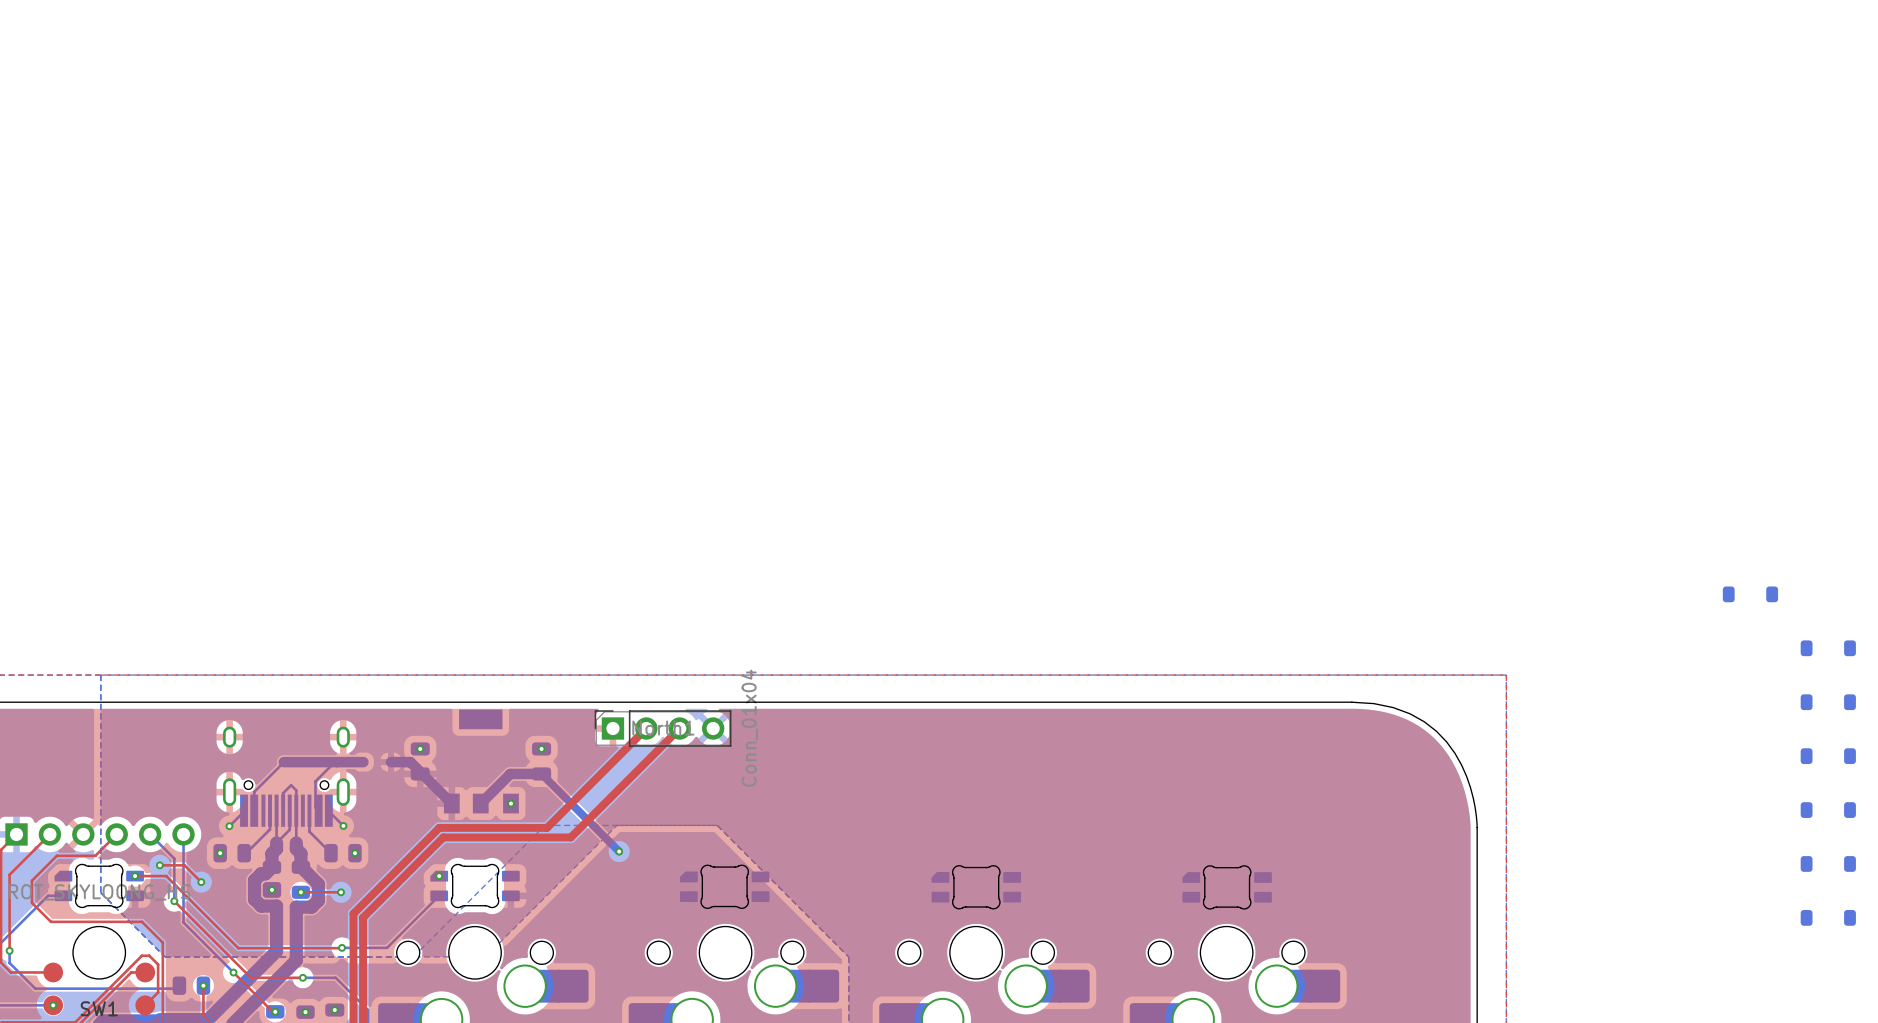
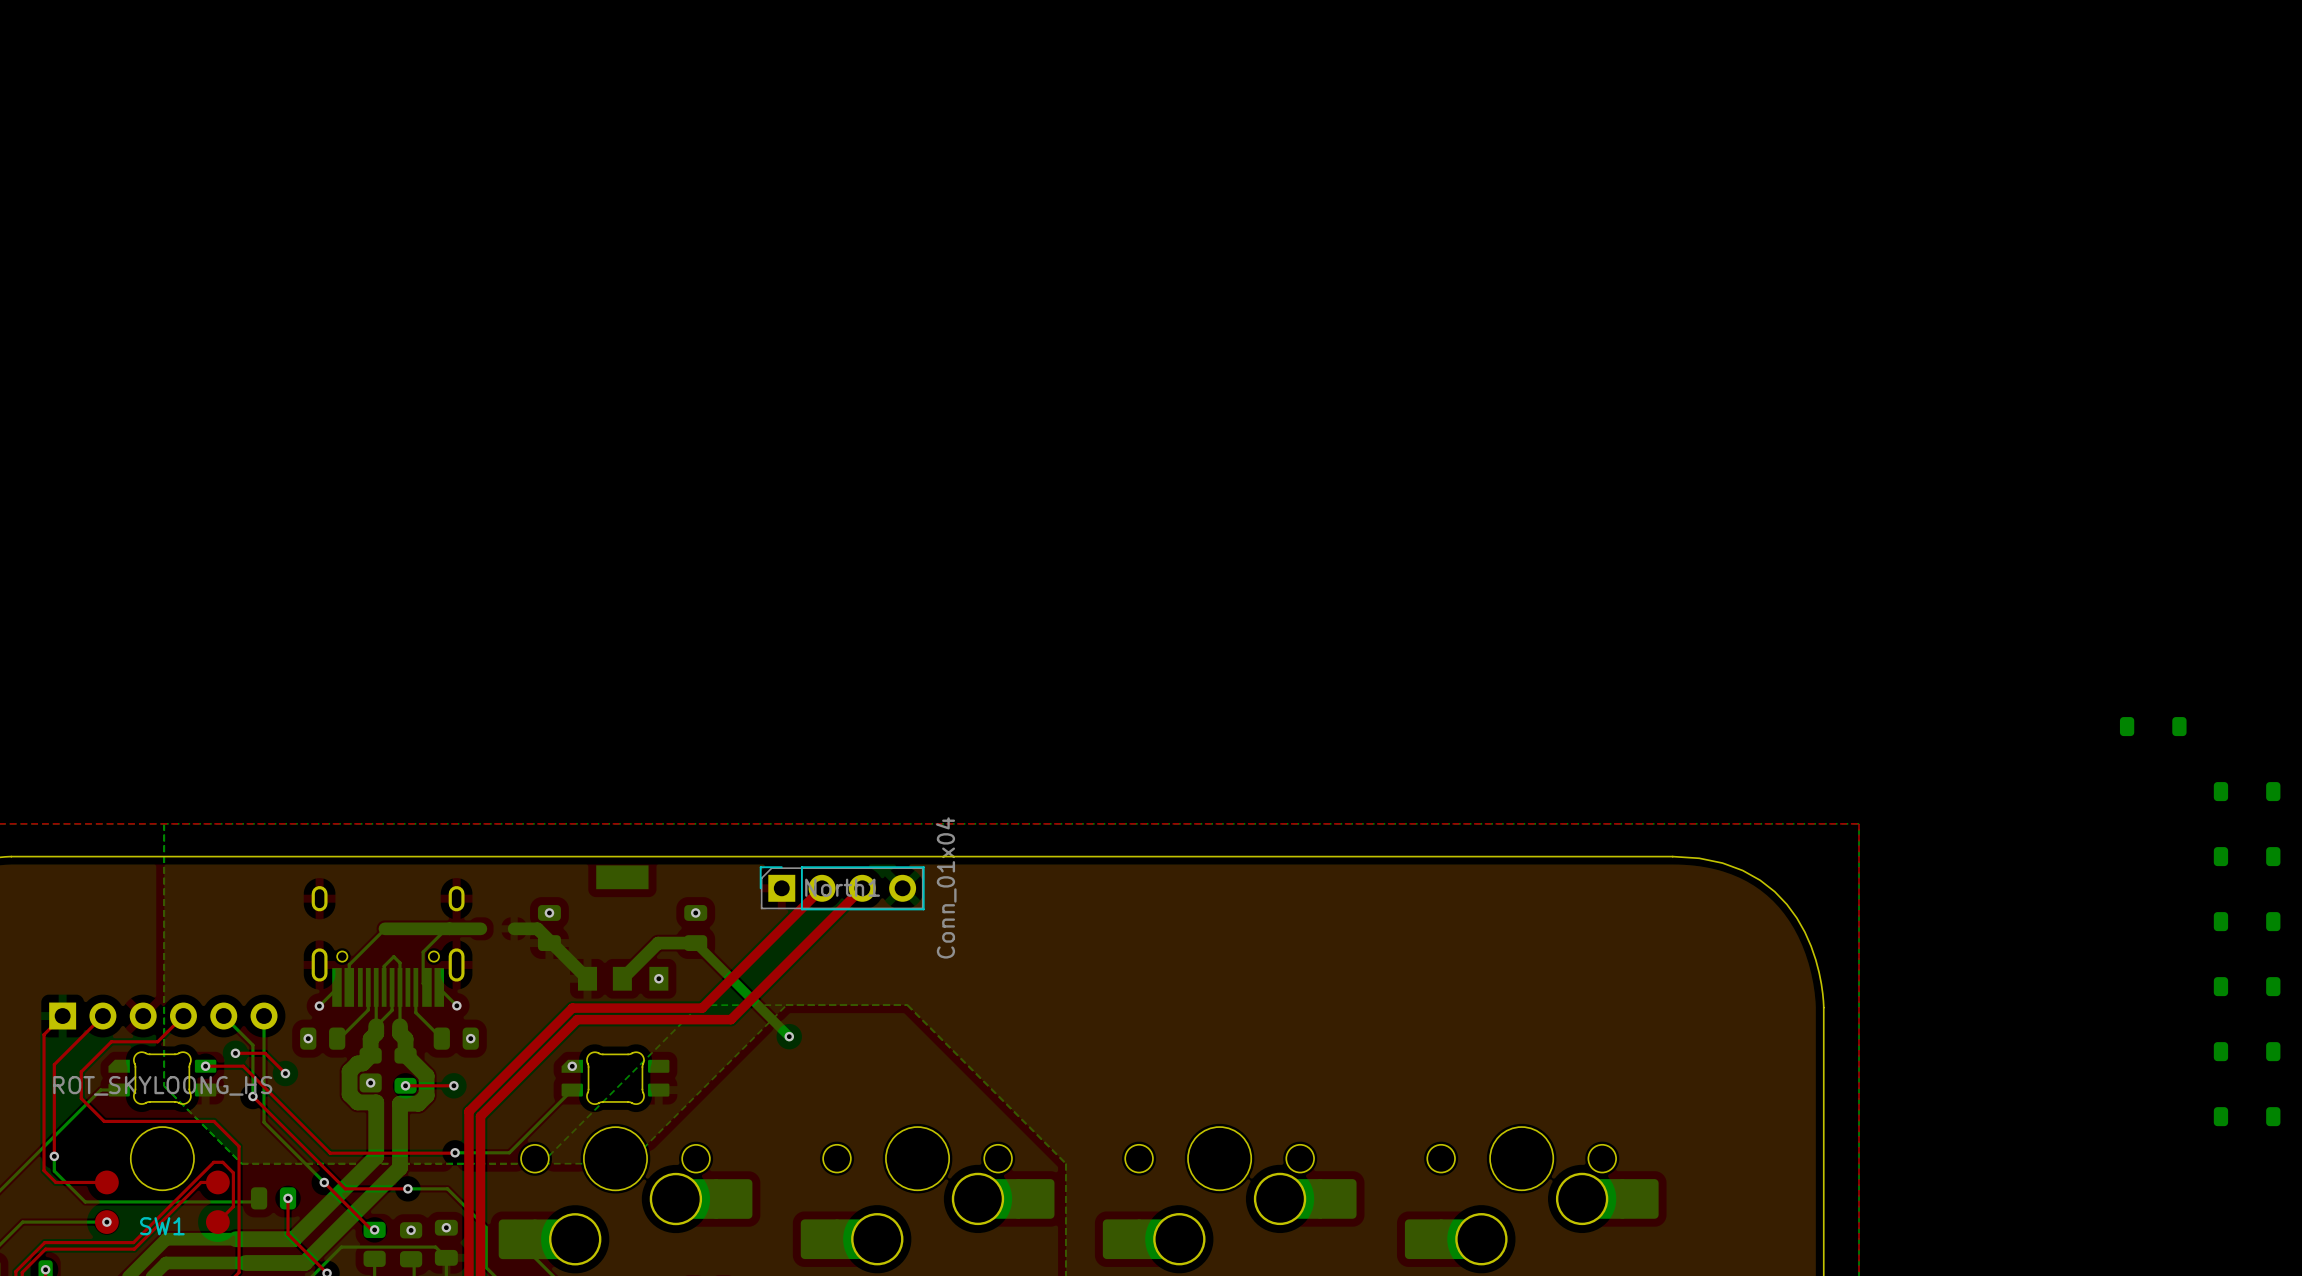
part: (724, 886) -> none
part: (976, 887) -> none
part: (1227, 887) -> none

